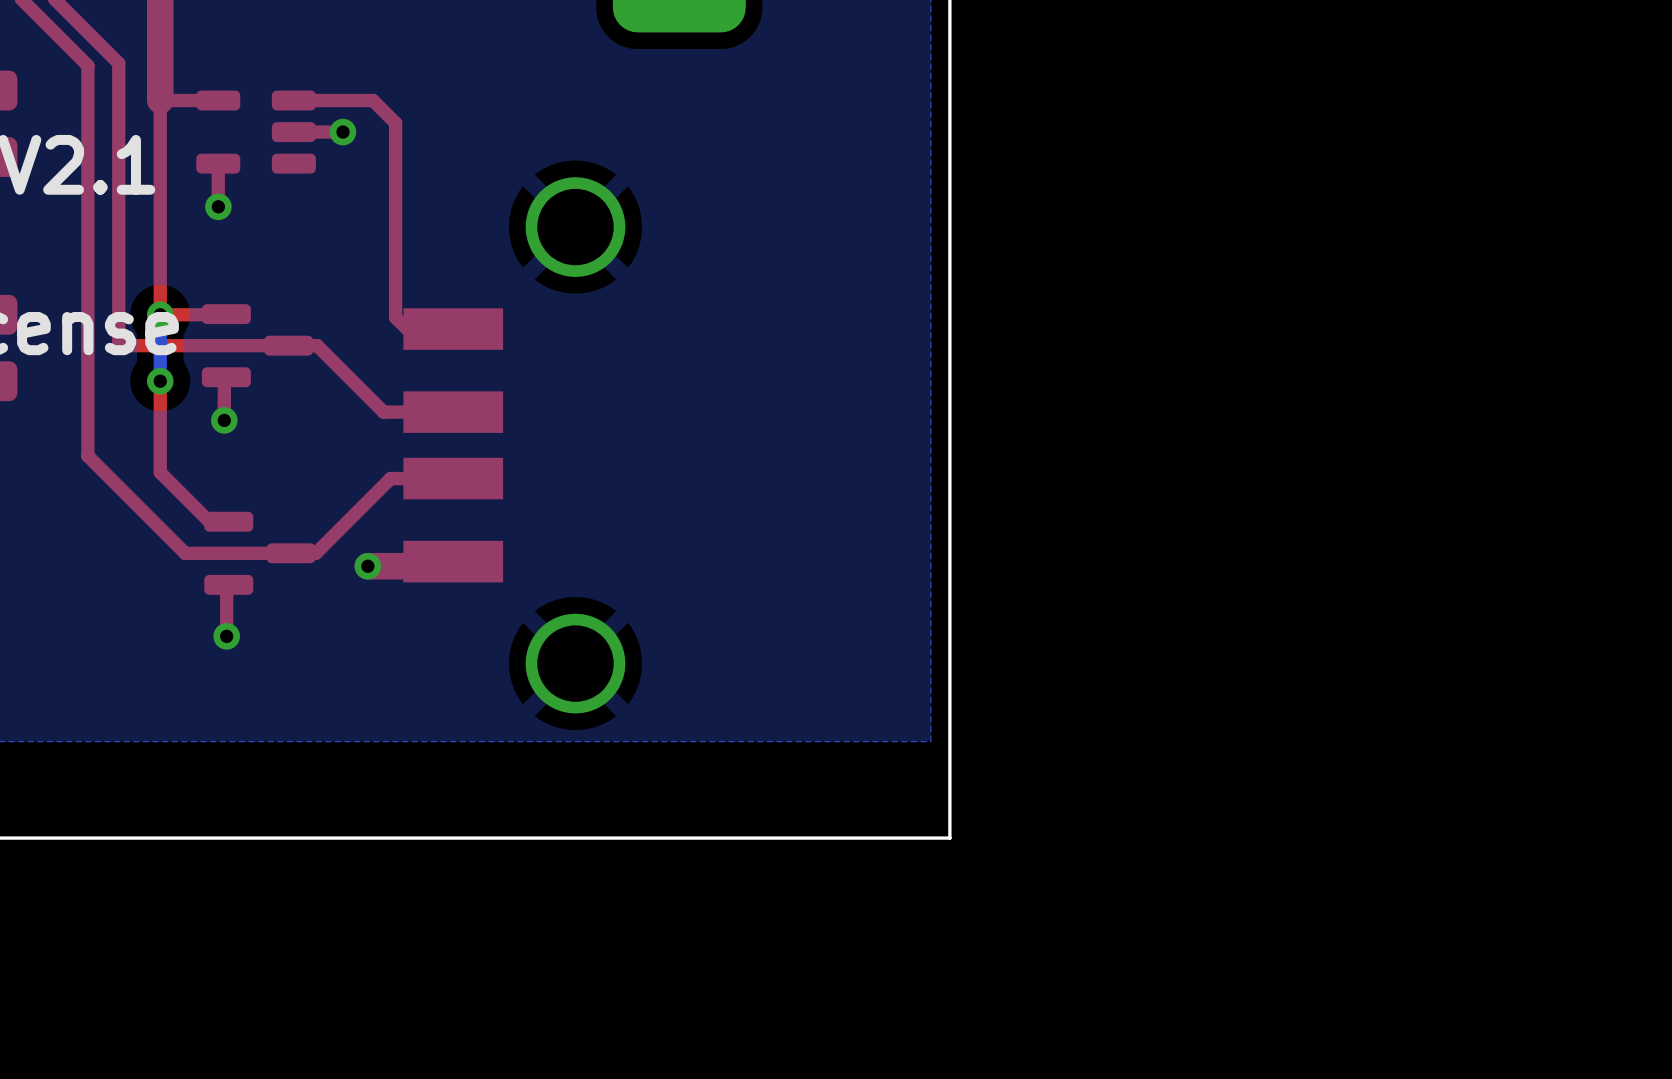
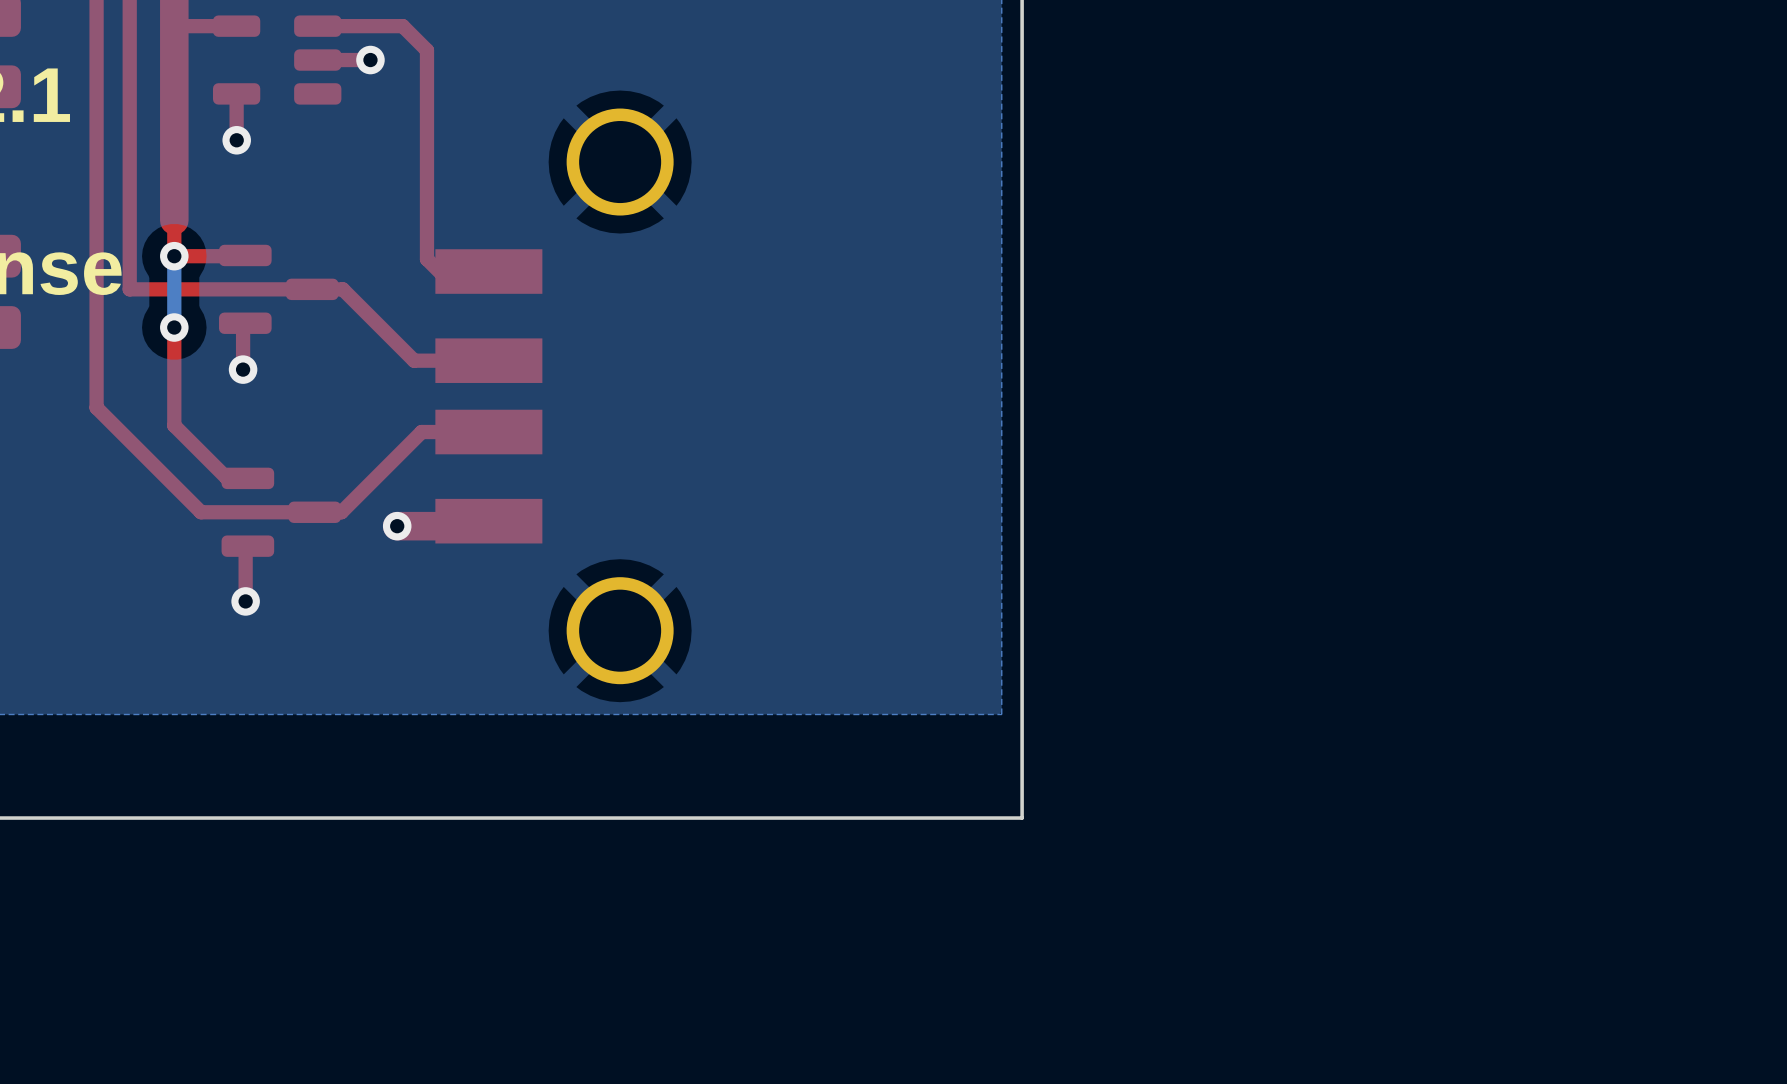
top track width: thin (160, 100) (160, 281) -> thick (174, 26) (174, 220)

